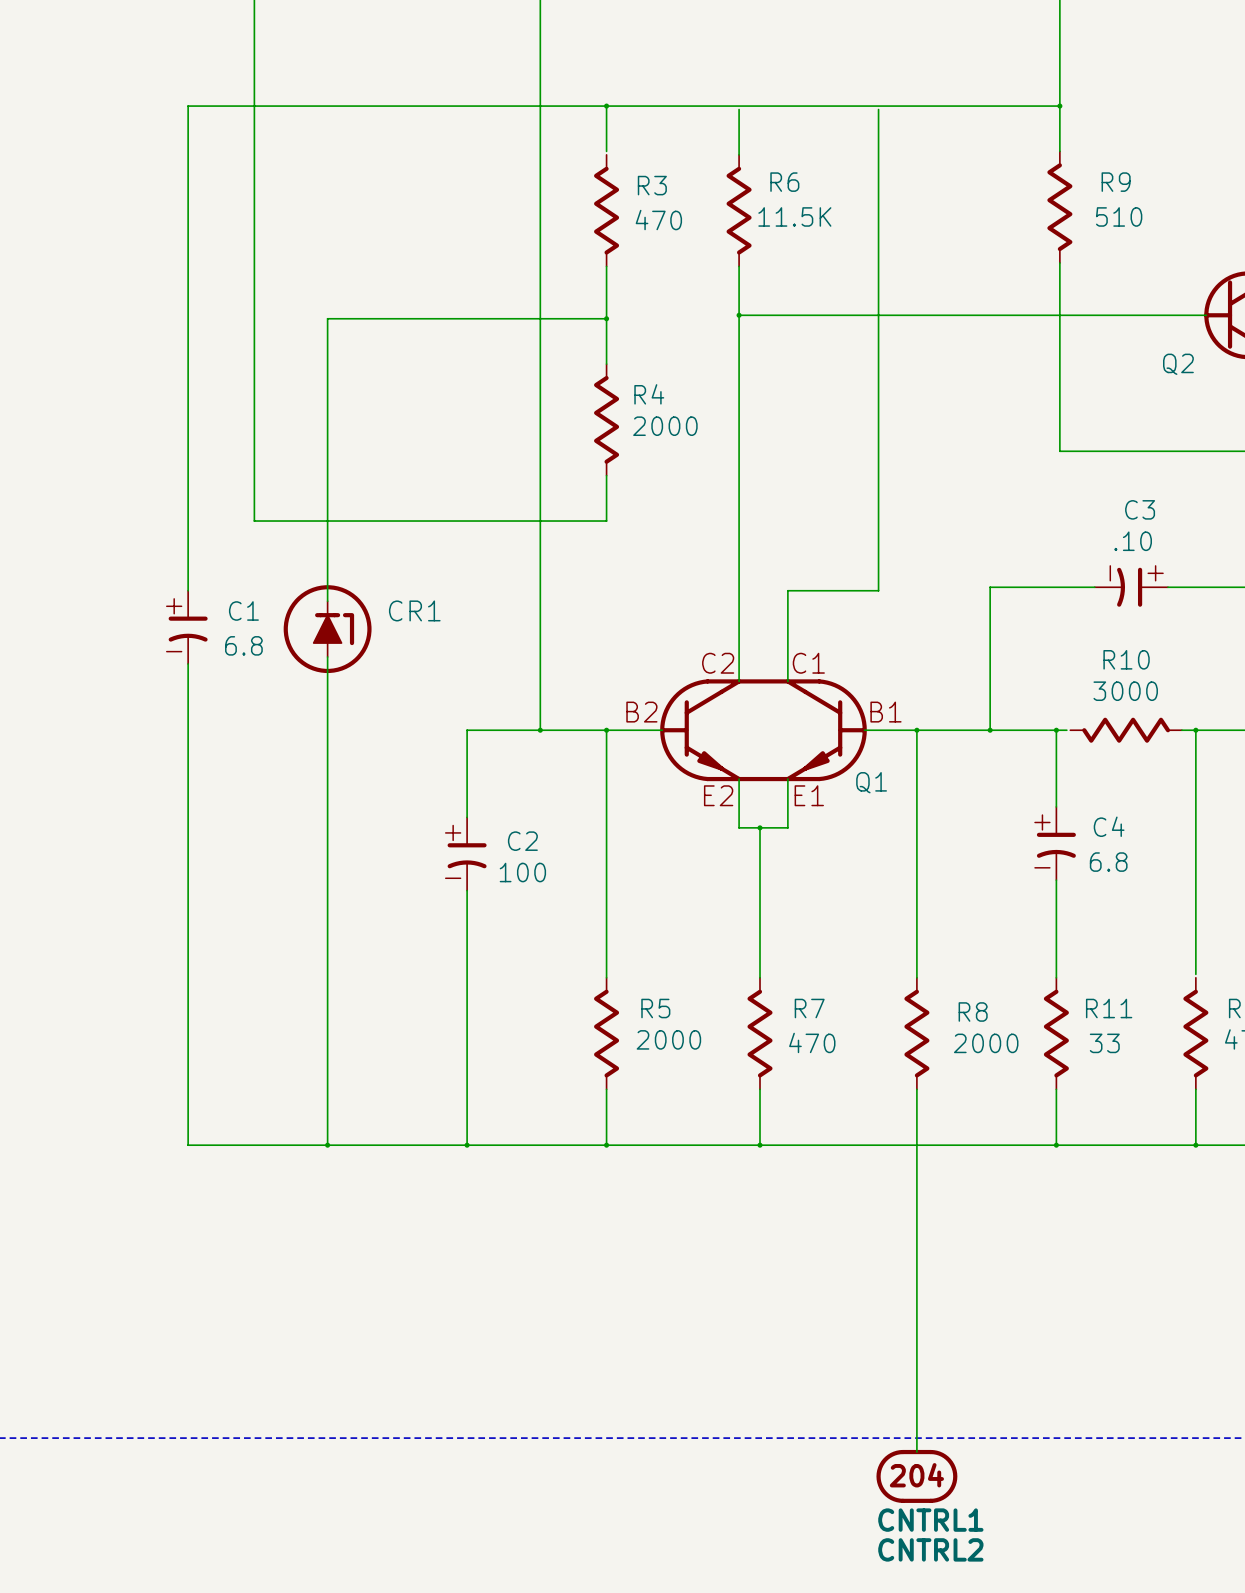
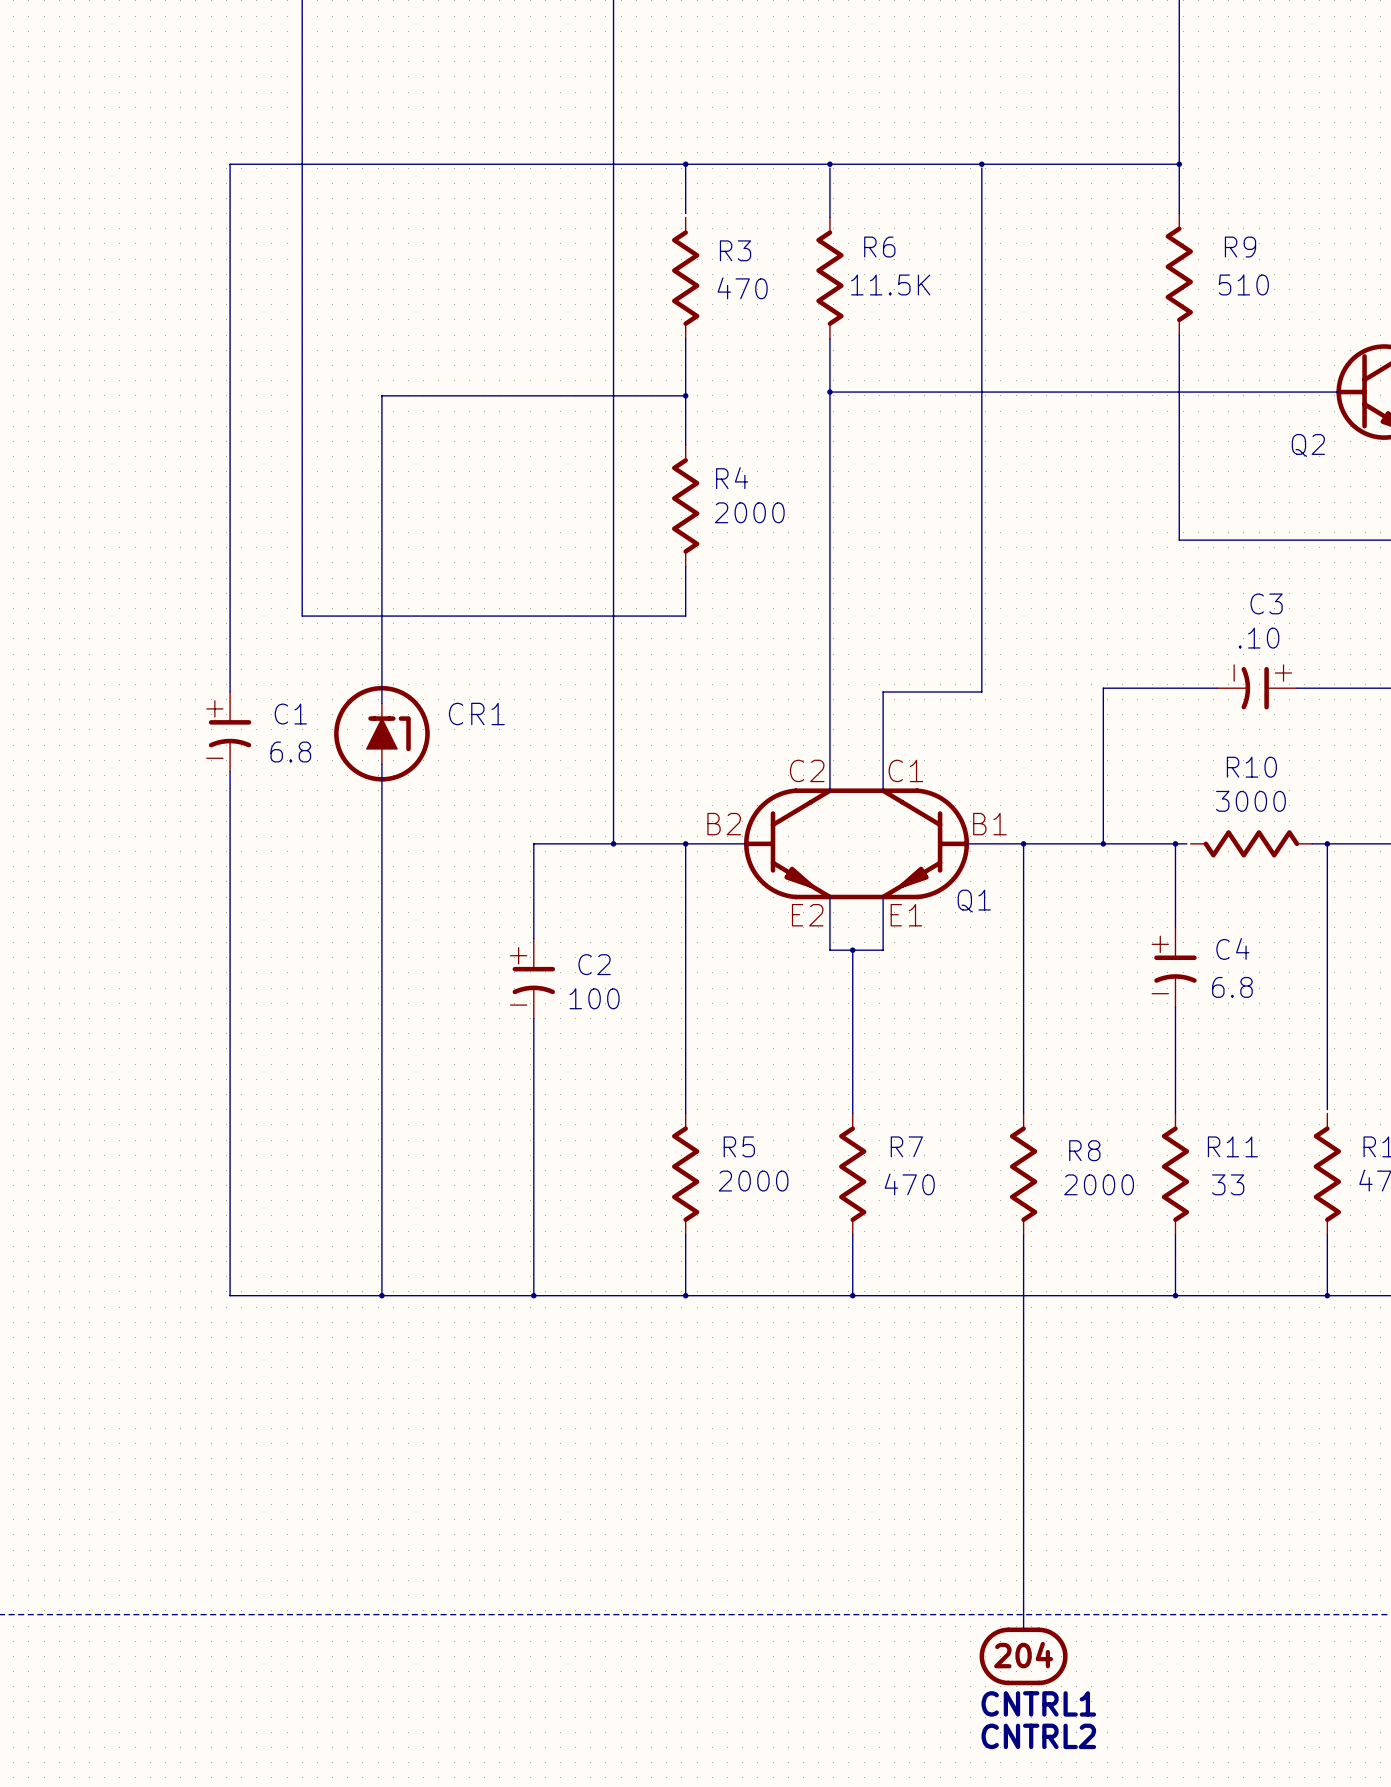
junction: none -> (829, 164)
junction: none -> (981, 164)

